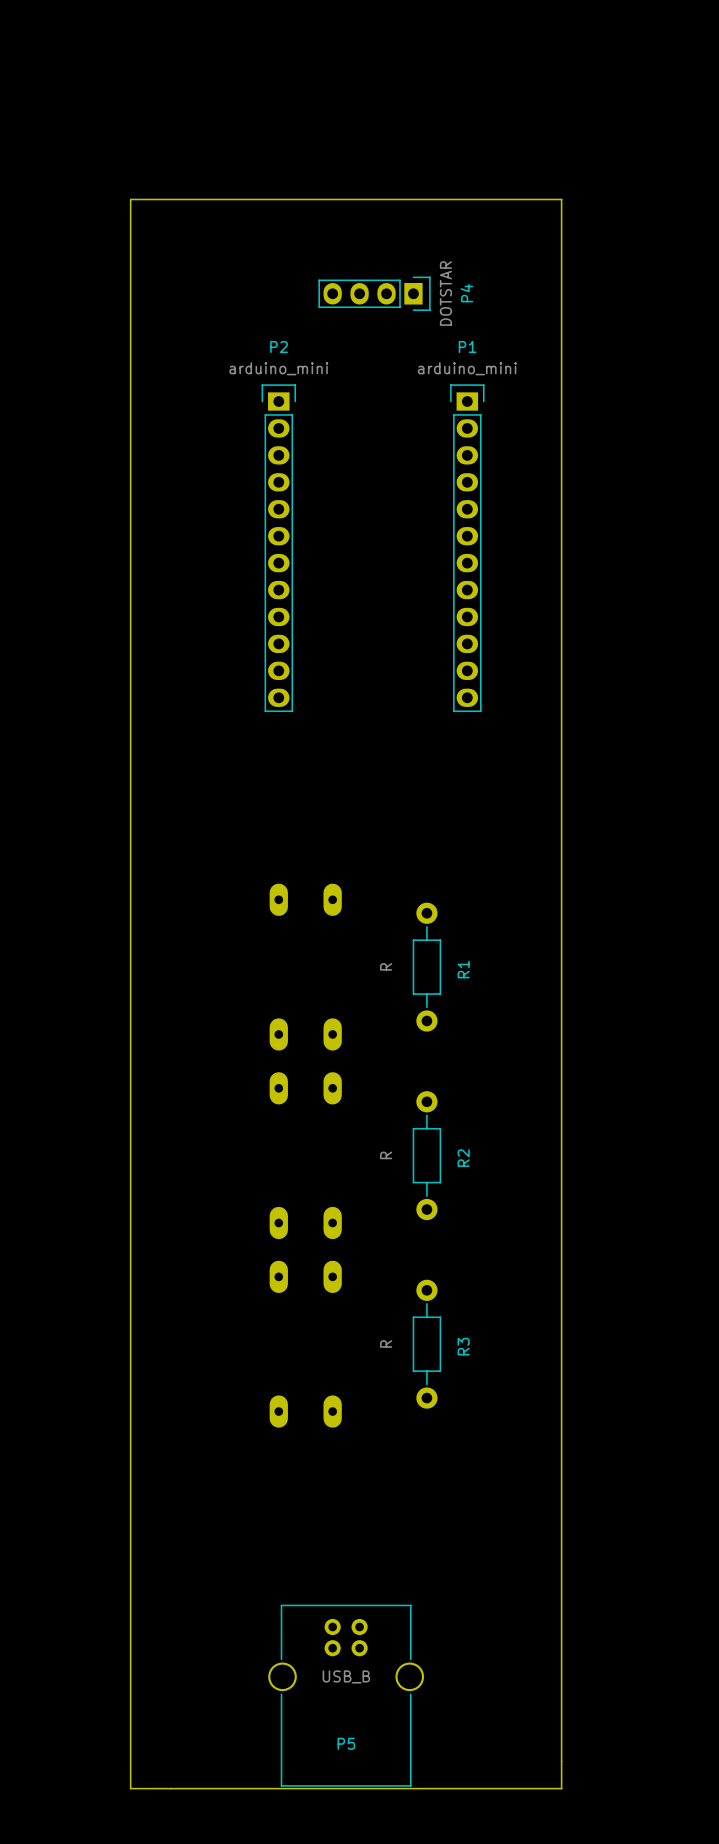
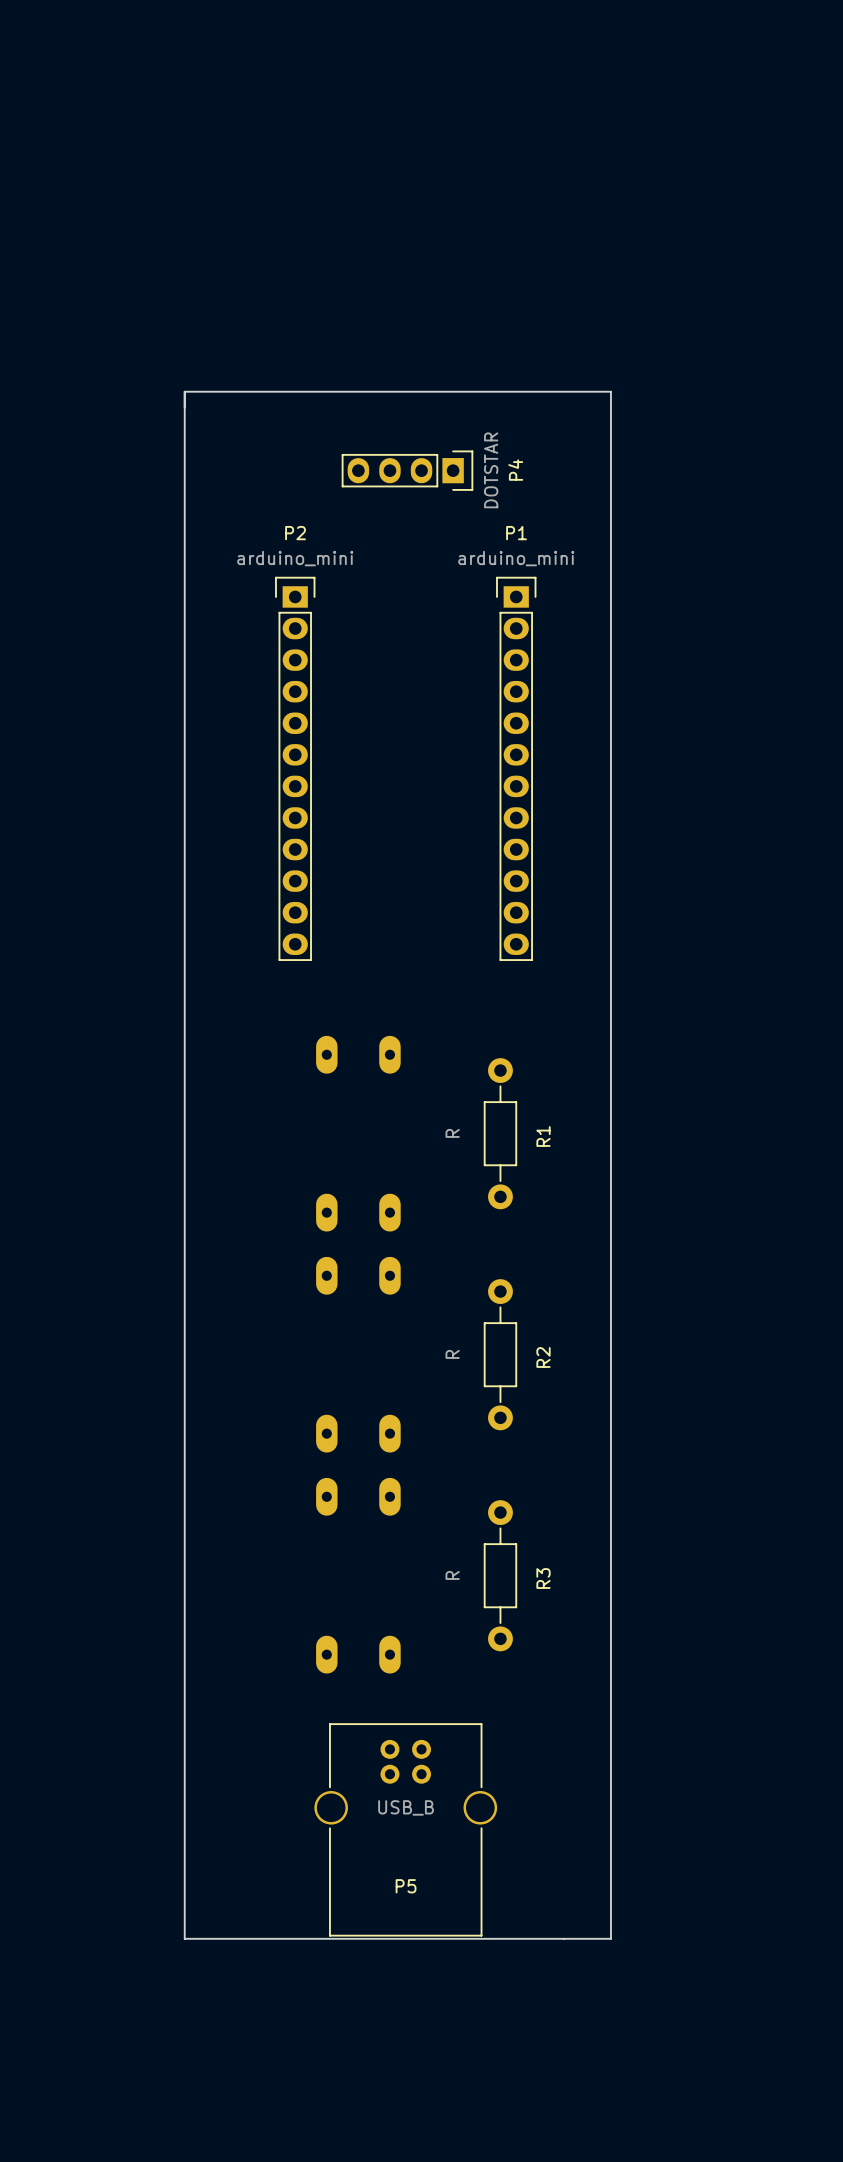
board edge: (130, 199) (561, 199) (561, 1788) (130, 1788) (130, 199) -> (184, 391) (184, 1938) (610, 1938) (610, 391) (184, 391)
P4 position: (374, 293) -> (407, 470)
P2 position: (278, 548) -> (295, 768)
P1 position: (467, 548) -> (516, 768)
P5 position: (346, 1695) -> (405, 1829)

